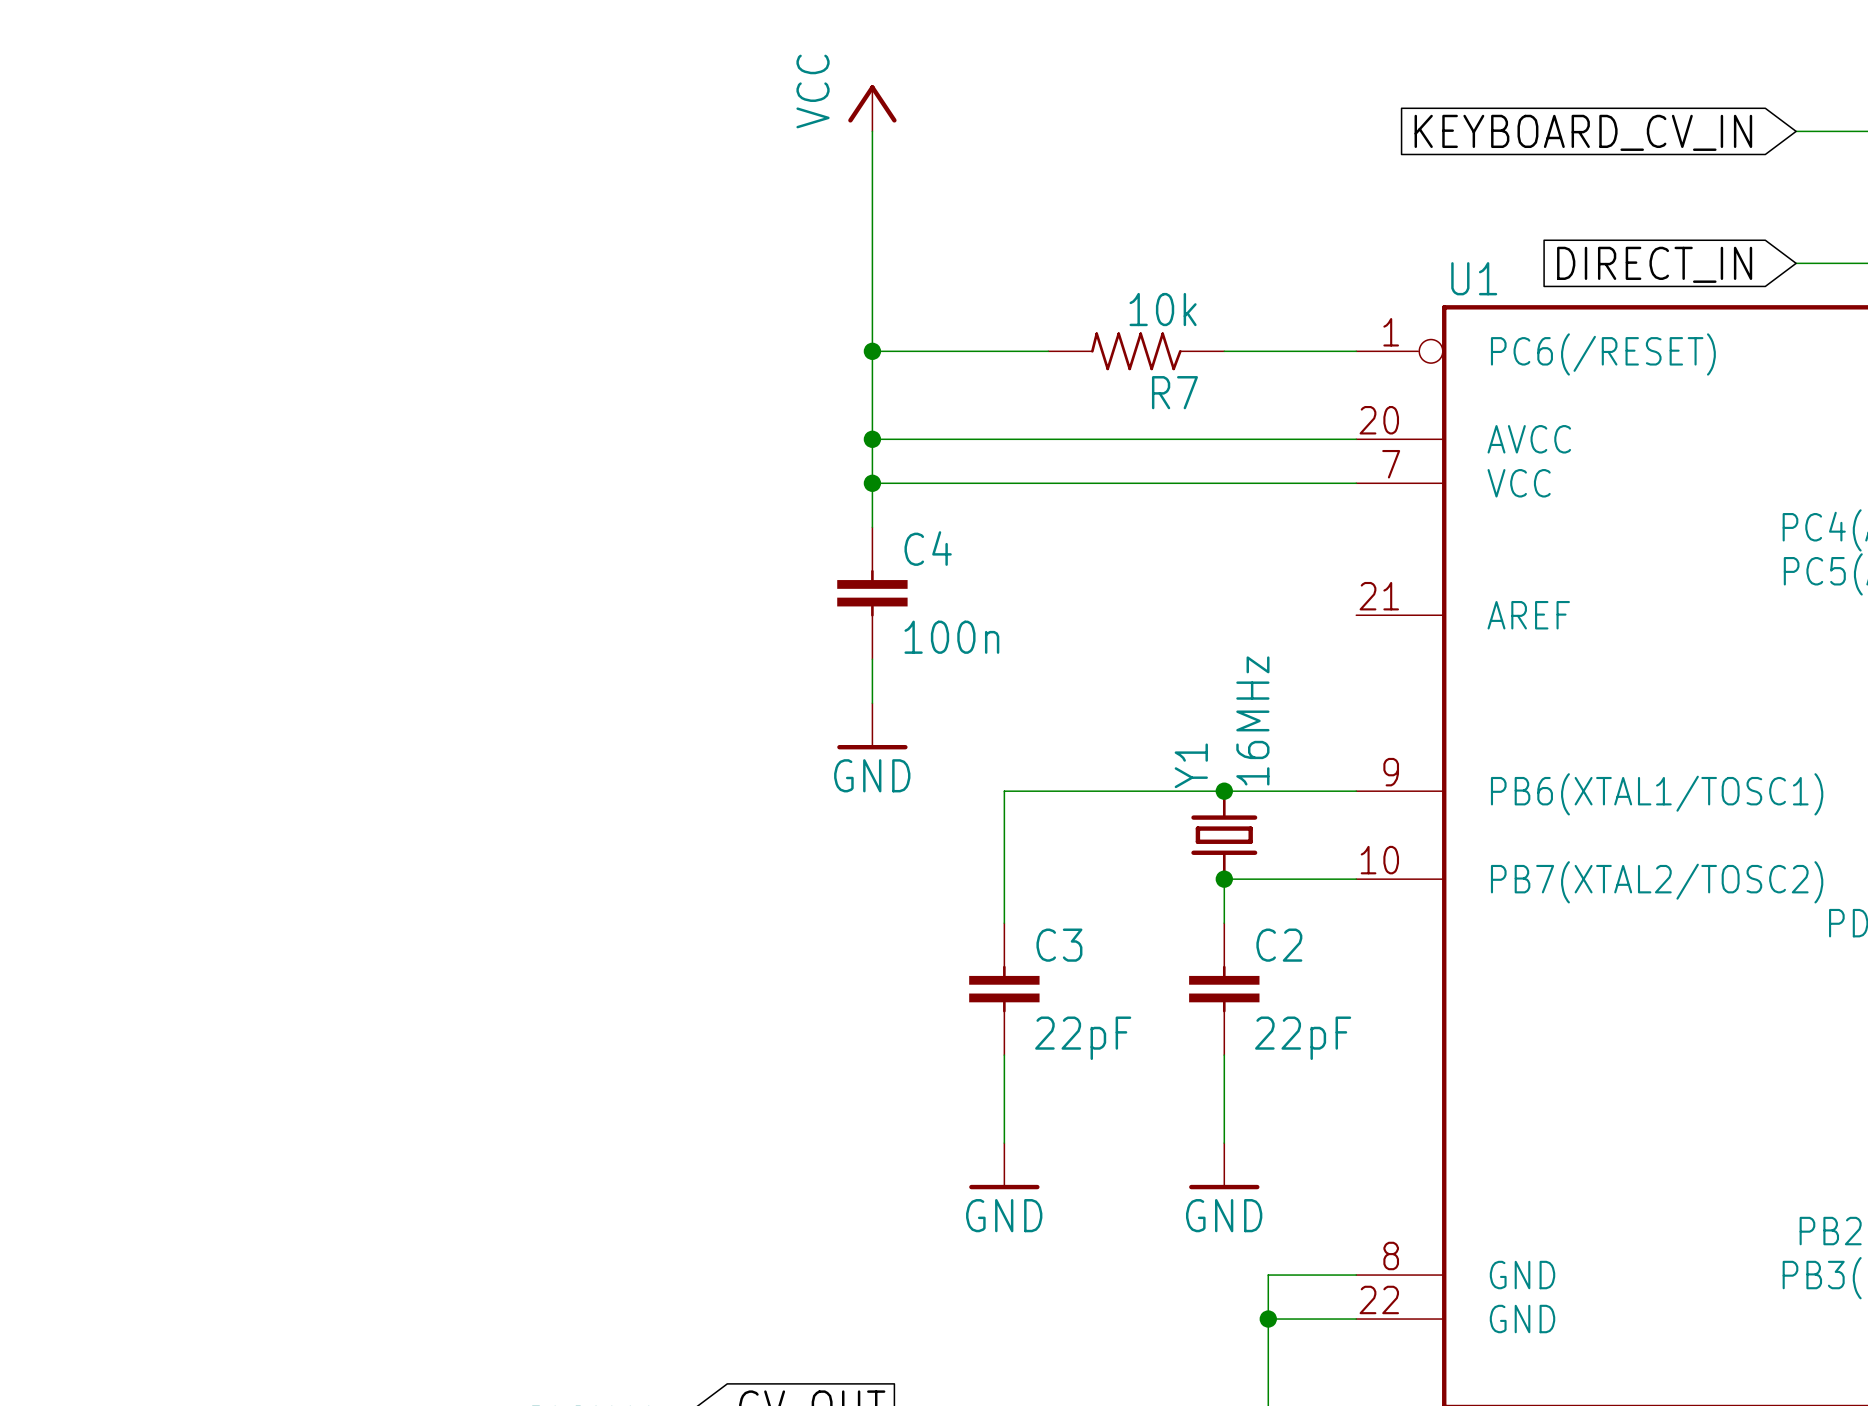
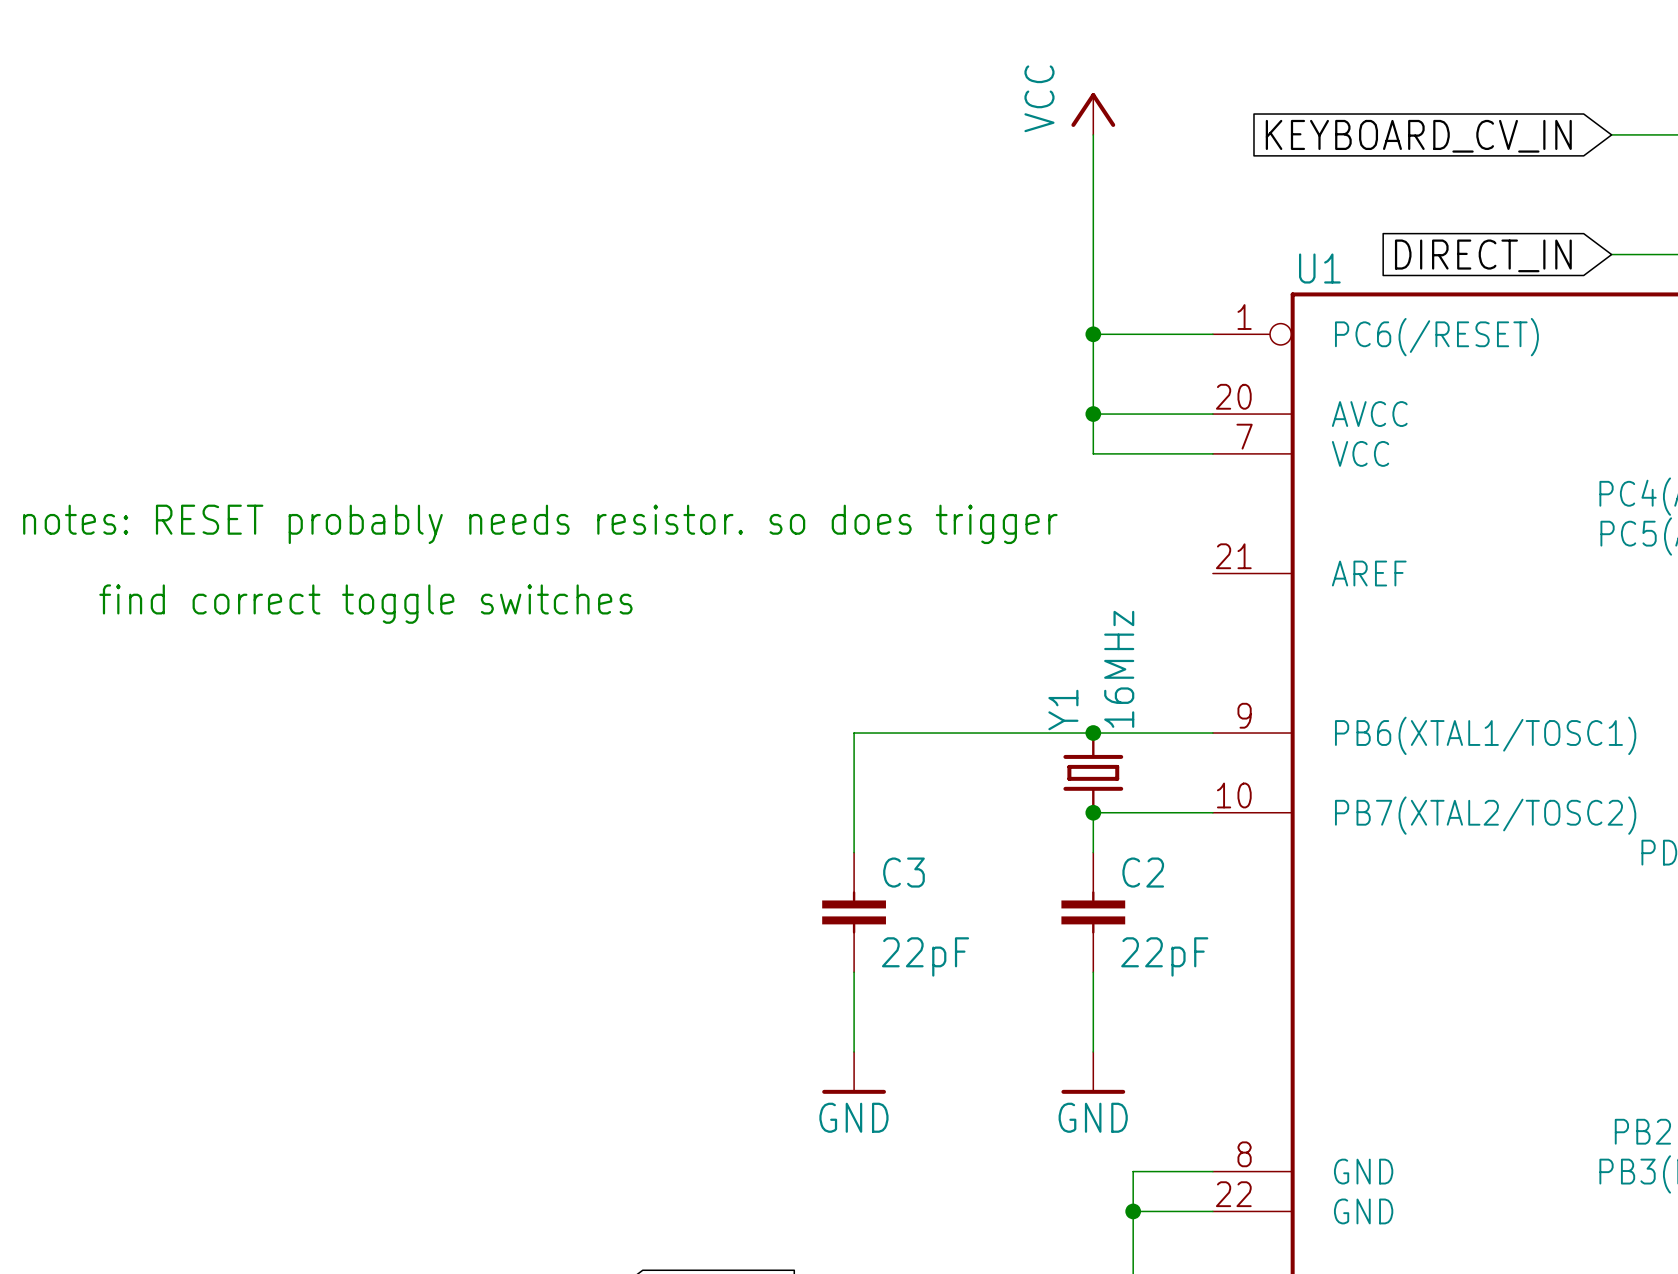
power symbol position: VCC (872, 108) -> VCC (1093, 114)
wire: (872, 131) (872, 527) -> none
wire: (872, 351) (1048, 351) -> none
junction: (872, 351) -> none
R7: 10k (1136, 351) -> none
junction: none -> (1093, 334)
wire: (872, 439) (1224, 439) -> none
junction: (872, 439) -> none
junction: none -> (1093, 414)
wire: (872, 483) (1224, 483) -> (1093, 134) (1093, 453)
junction: (872, 483) -> none
text: none -> notes: RESET probably needs resistor. so does trigger (540, 524)
C4: 100n (872, 593) -> none
text: none -> find correct toggle switches (365, 604)
wire: (872, 659) (872, 703) -> none
power symbol: GND (872, 726) -> none
wire: (1004, 791) (1004, 923) -> (893, 733) (854, 733) (854, 852)
C3 position: (1004, 989) -> (854, 912)
wire: (1004, 1055) (1004, 1143) -> (854, 972) (854, 1051)
power symbol position: GND (1004, 1166) -> GND (854, 1072)

